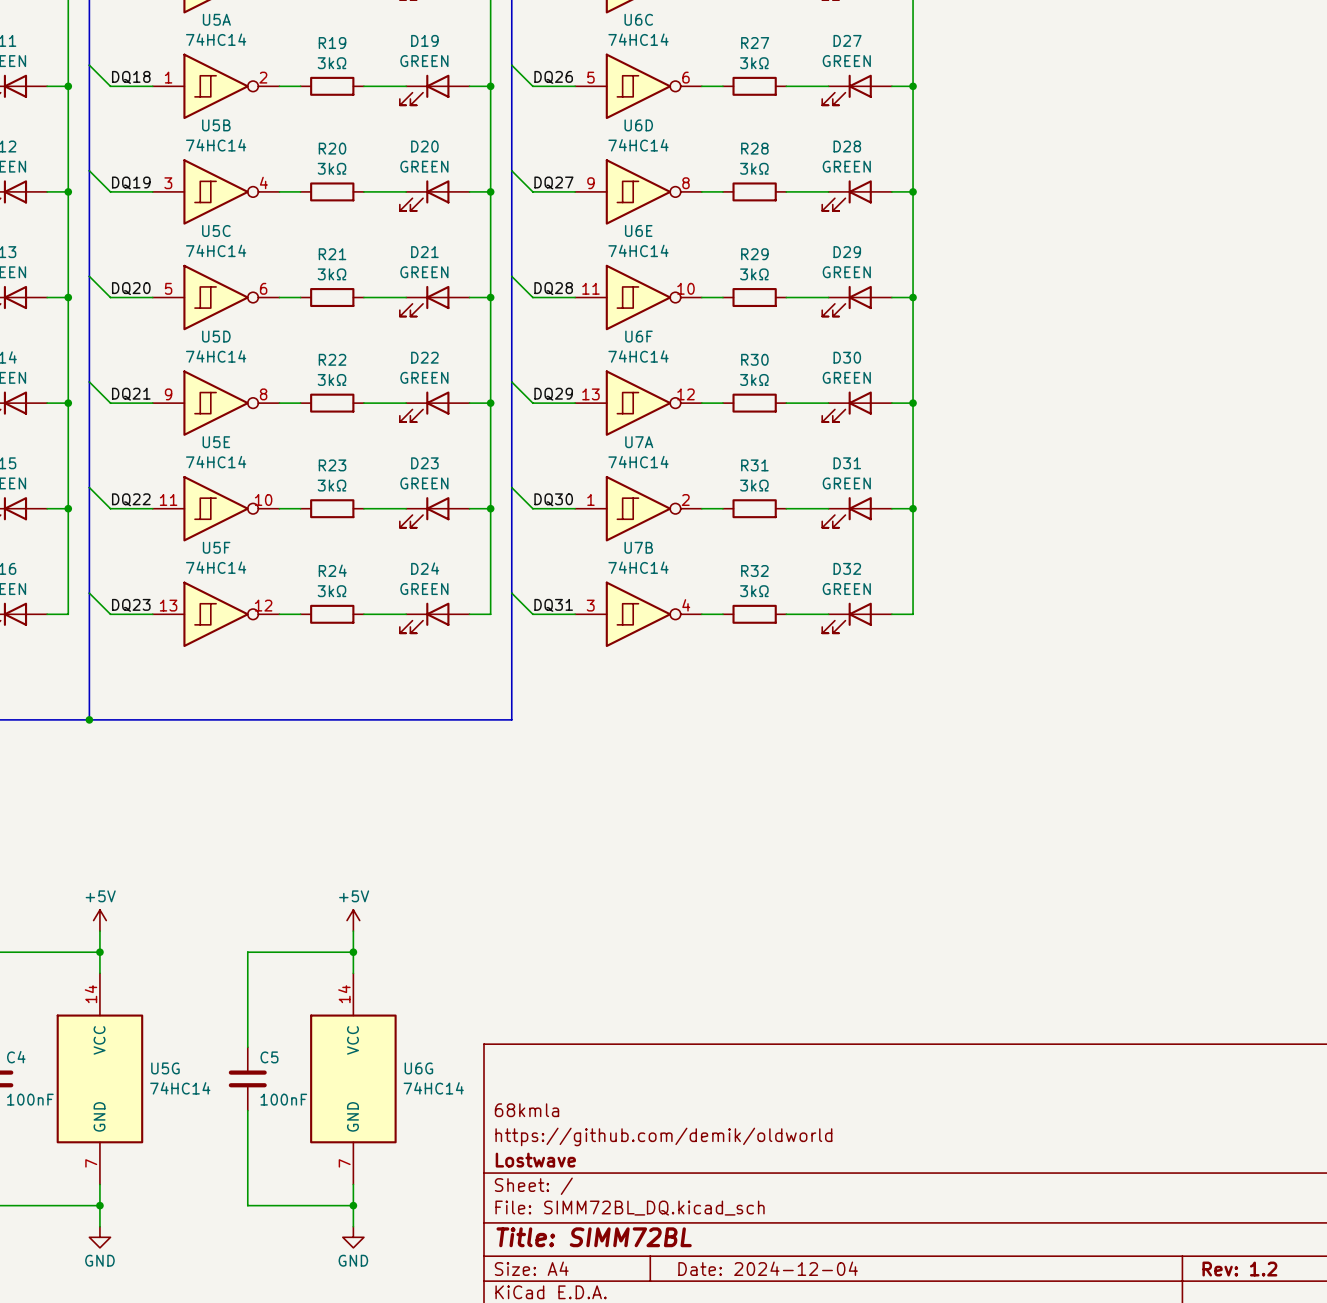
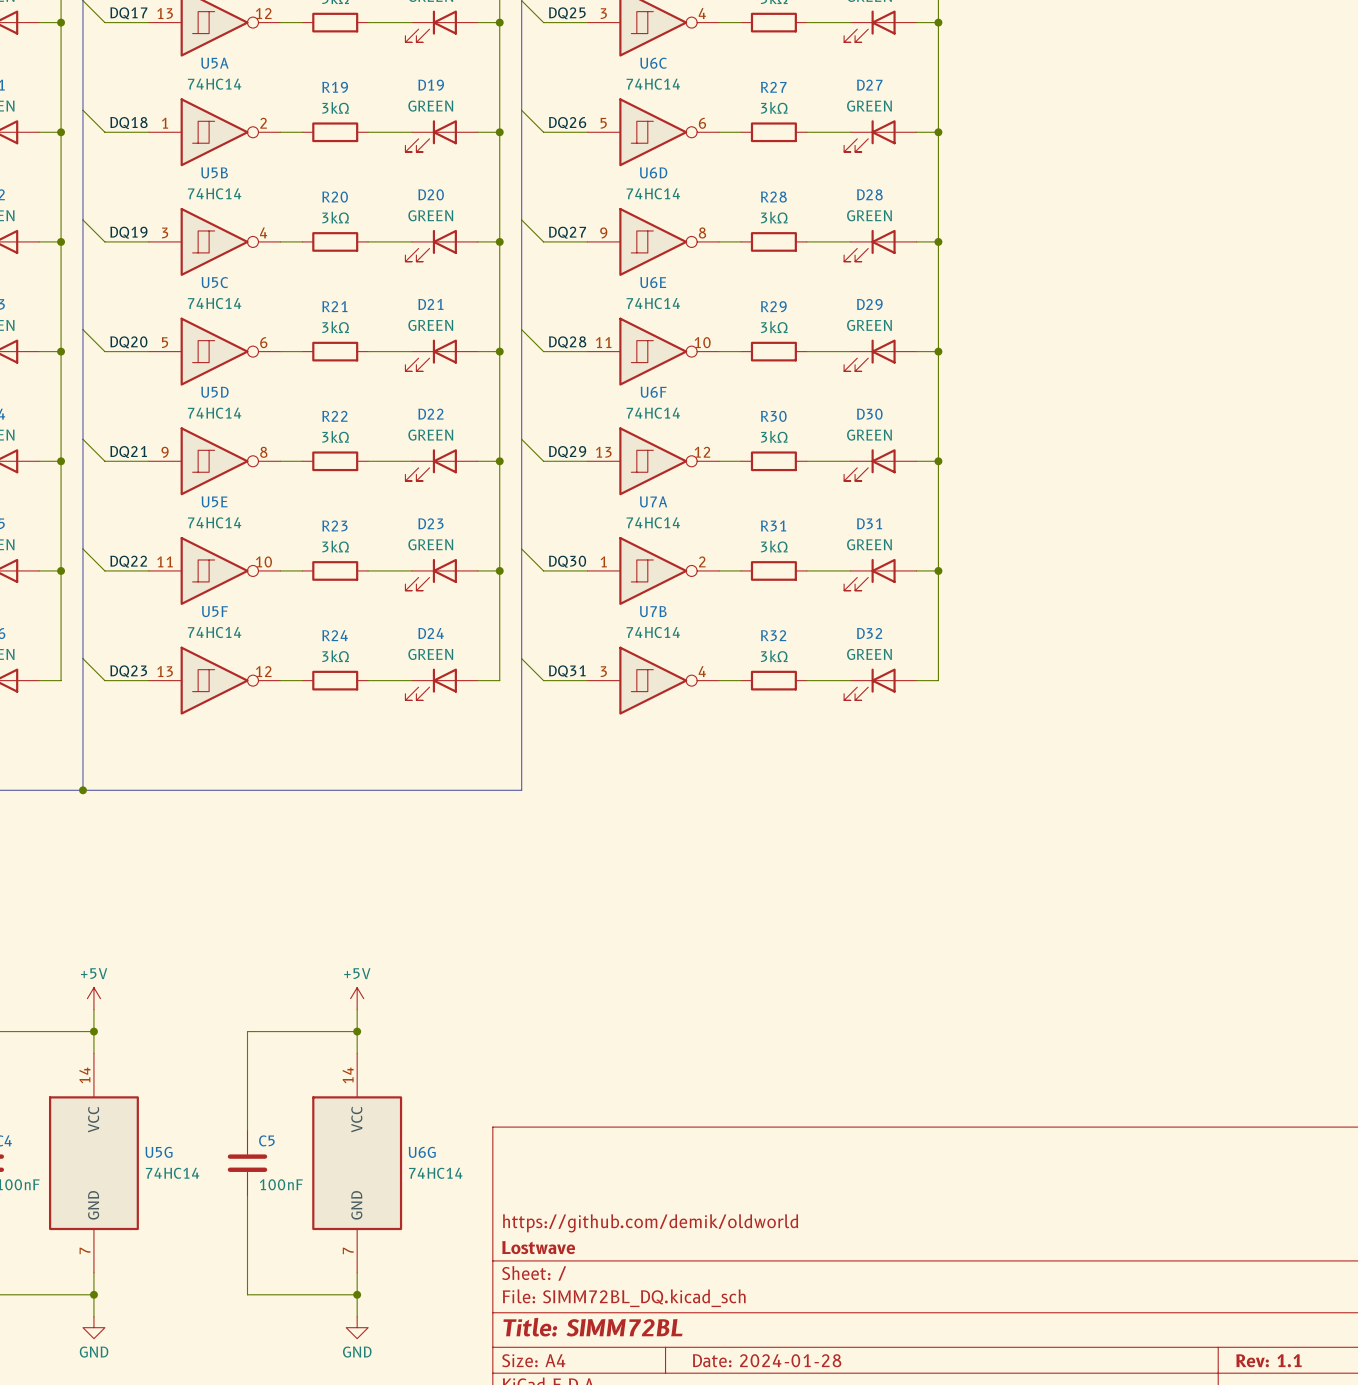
title block: 68kmla (527, 1110) -> none
title block: Date: 2024-12-04 (768, 1268) -> Date: 2024-01-28 (767, 1360)
title block: Rev: 1.2 (1239, 1269) -> Rev: 1.1 (1268, 1360)

